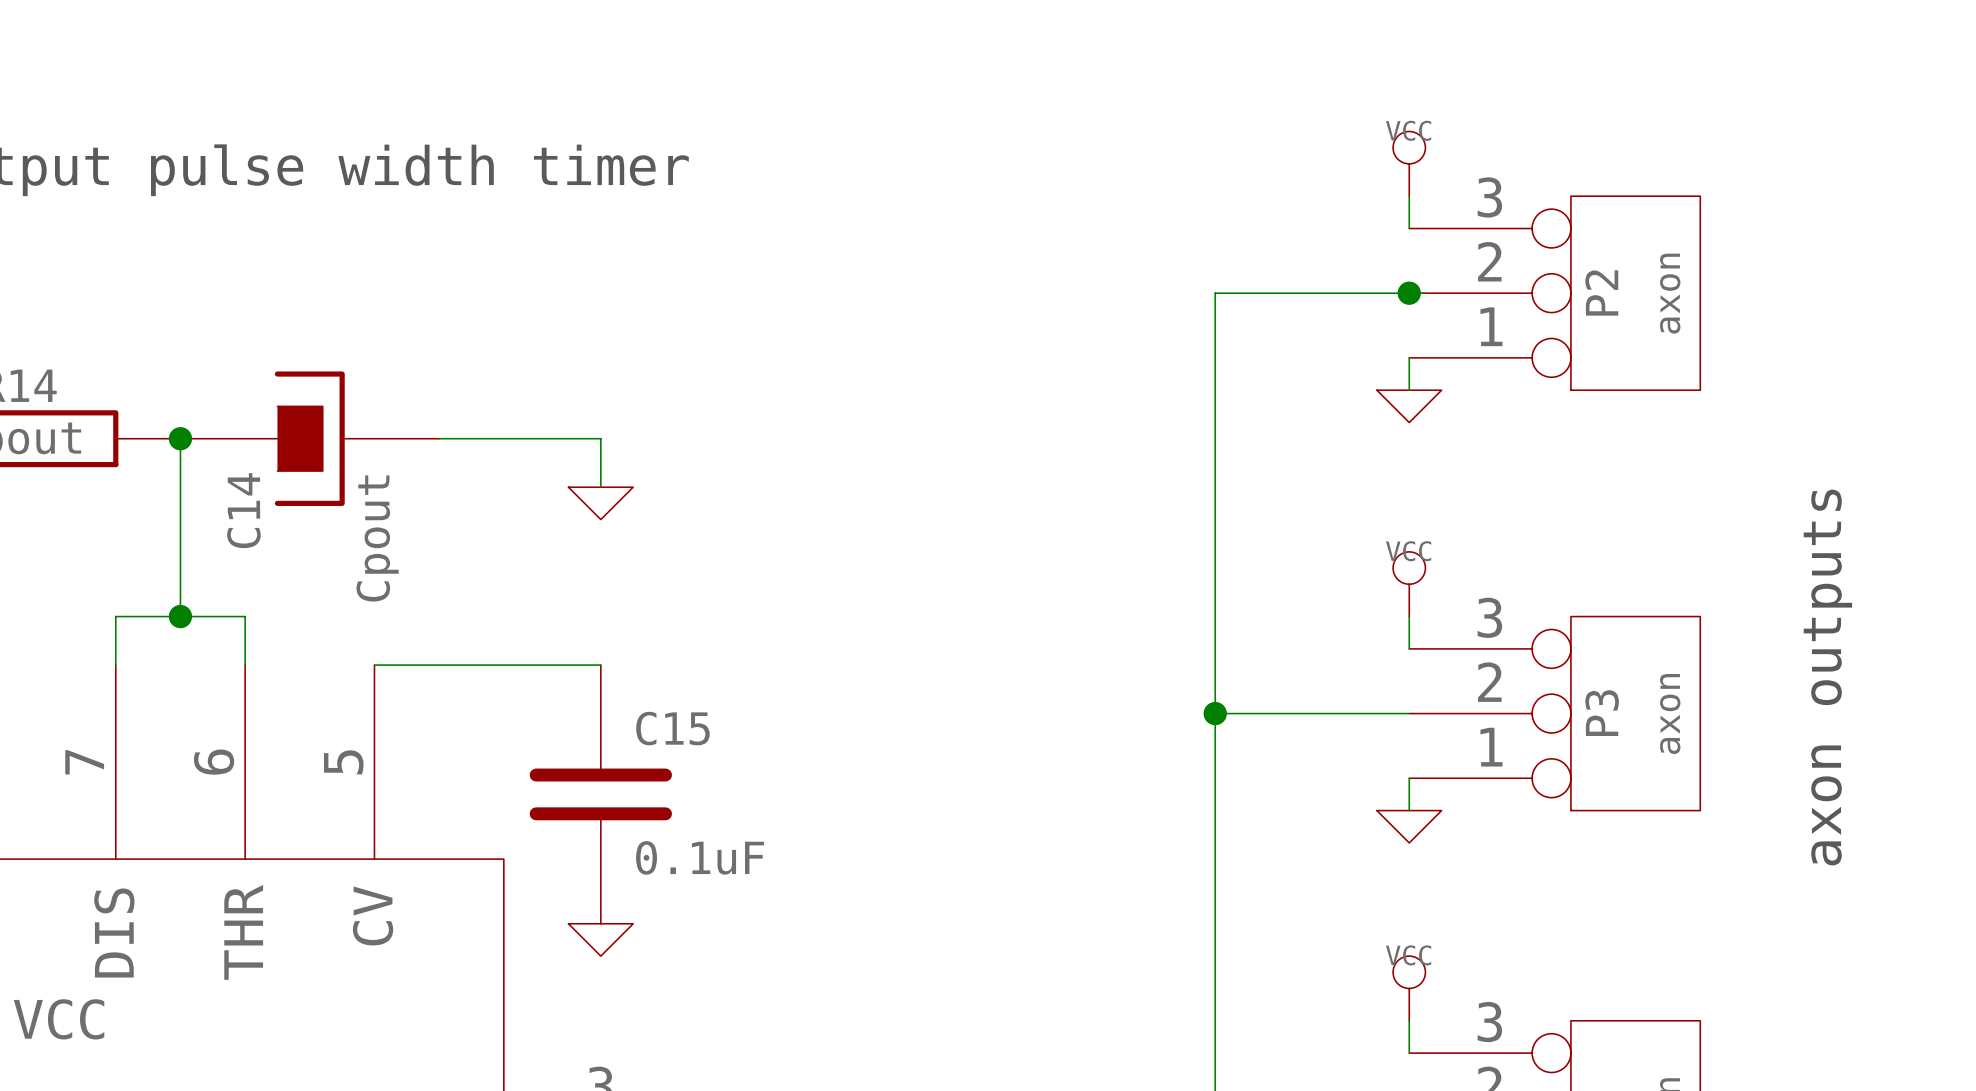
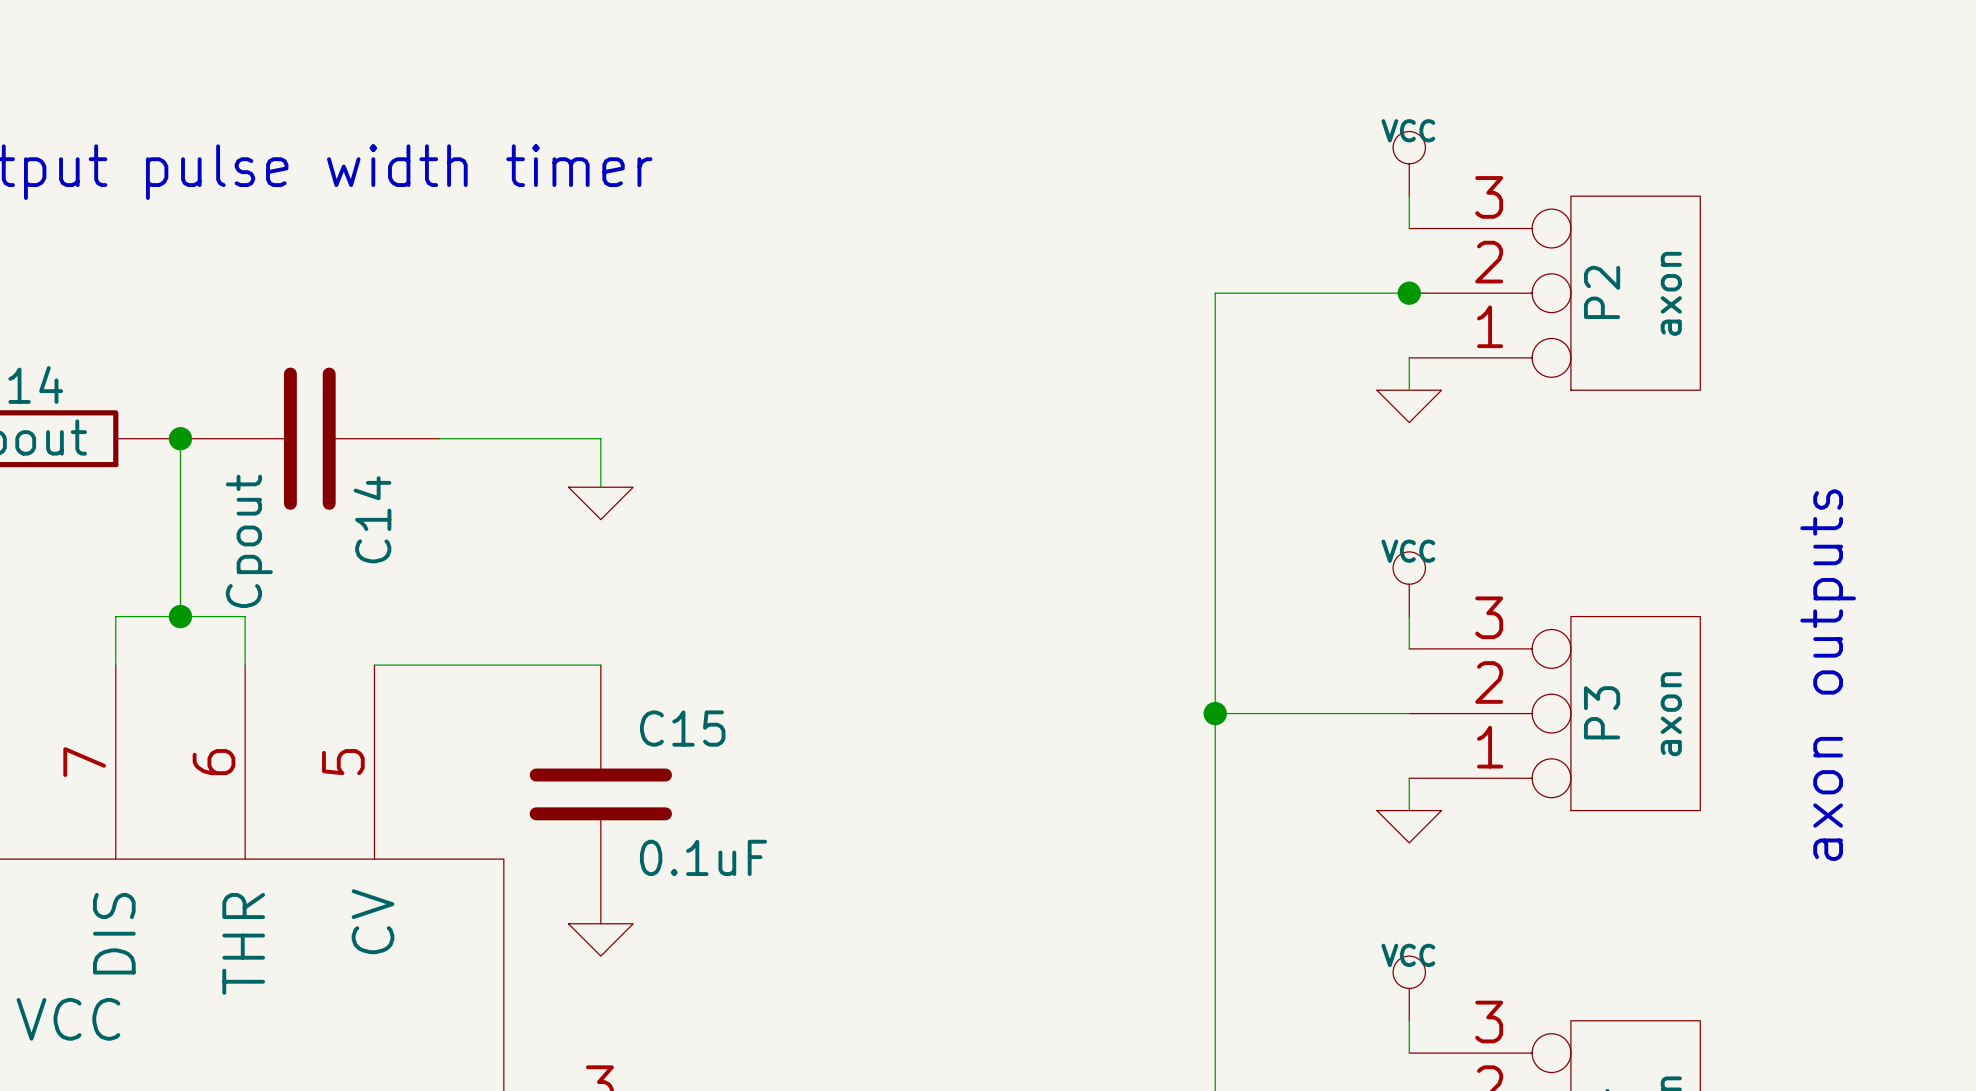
C14 symbol: [180, 371, 440, 506] -> [180, 367, 440, 510]
C14 name position: C14 (243, 510) -> C14 (372, 519)
C14 value position: Cpout (377, 538) -> Cpout (249, 541)

